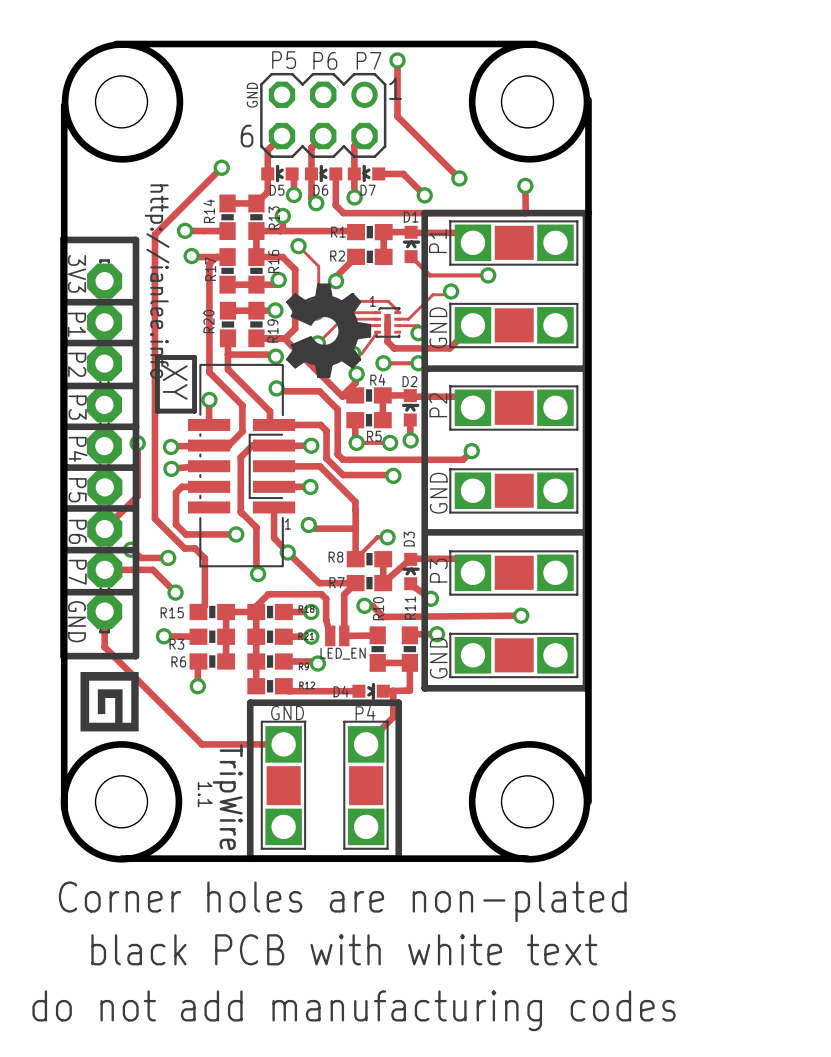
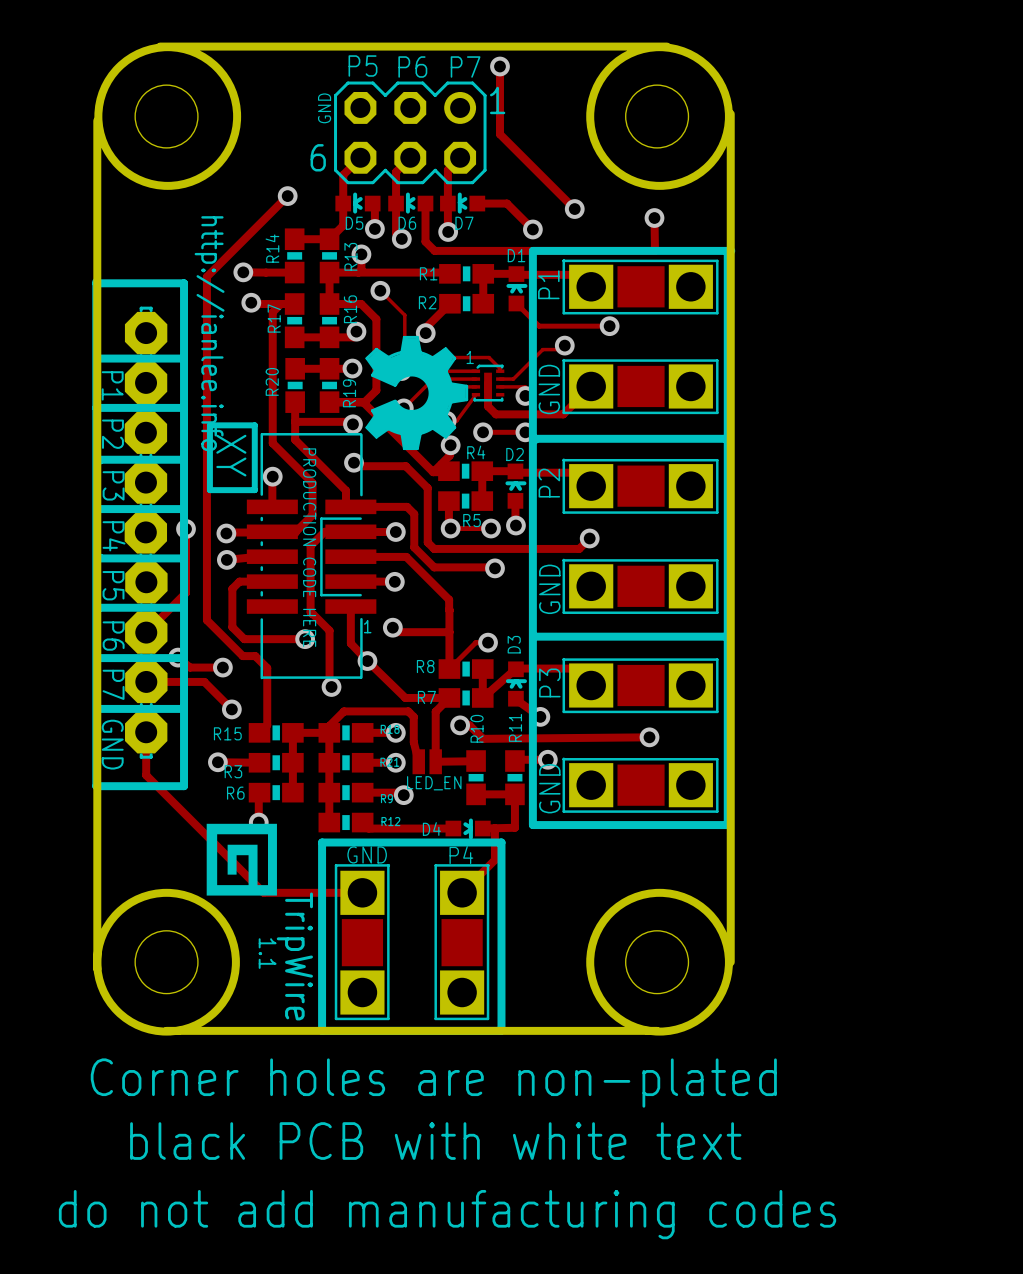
3V3 name: 3V3 (76, 273) -> none
text: none -> PRODUCTION CODE HERE (309, 547)
drawing: [80, 672, 139, 732] -> none
drawing: none -> [206, 823, 277, 896]

